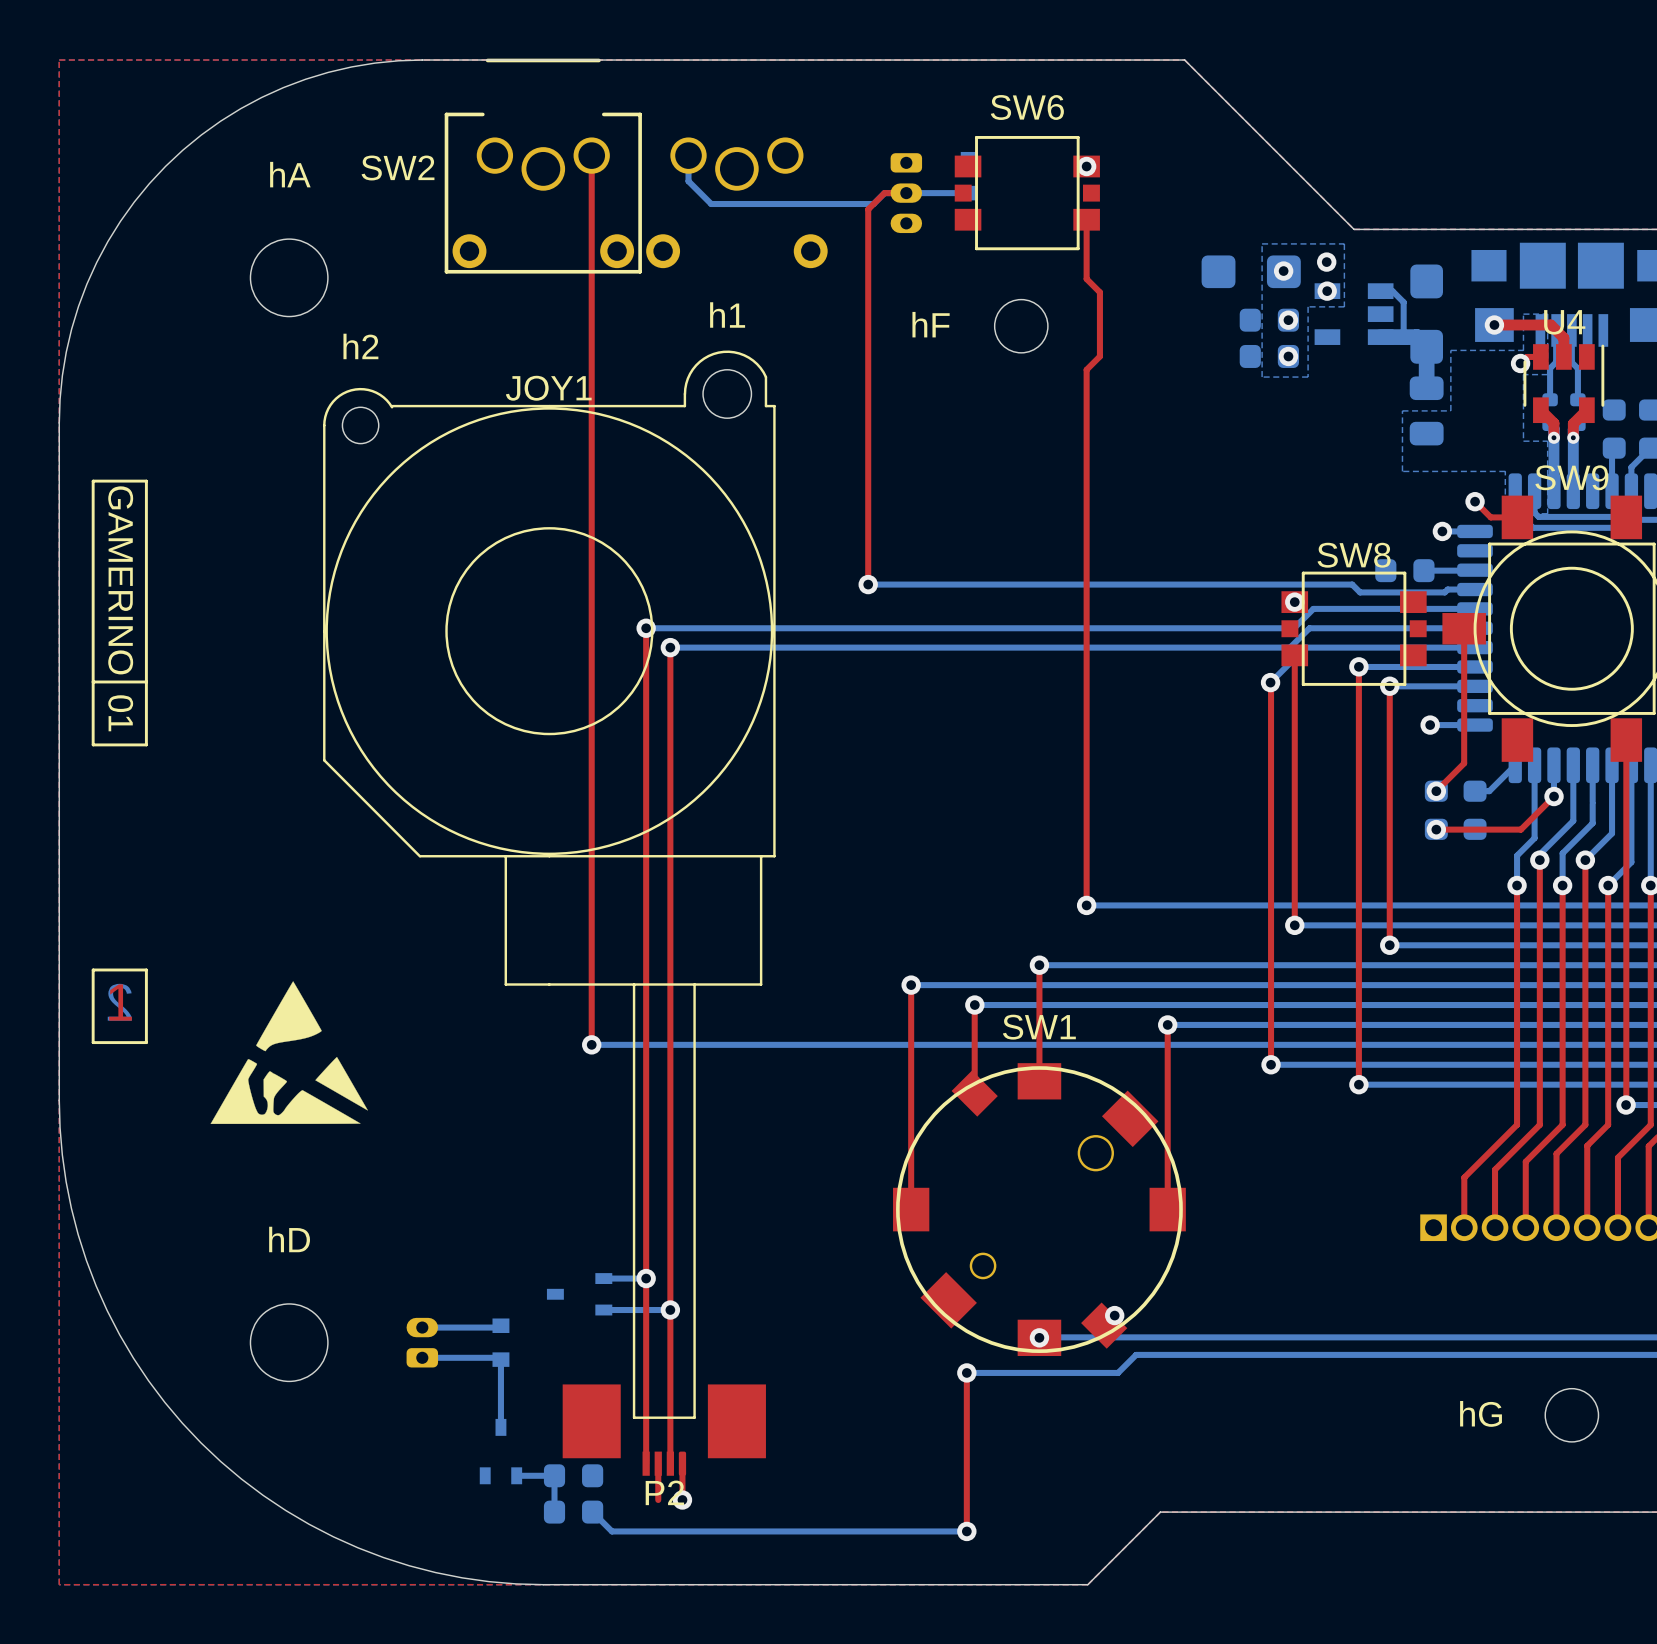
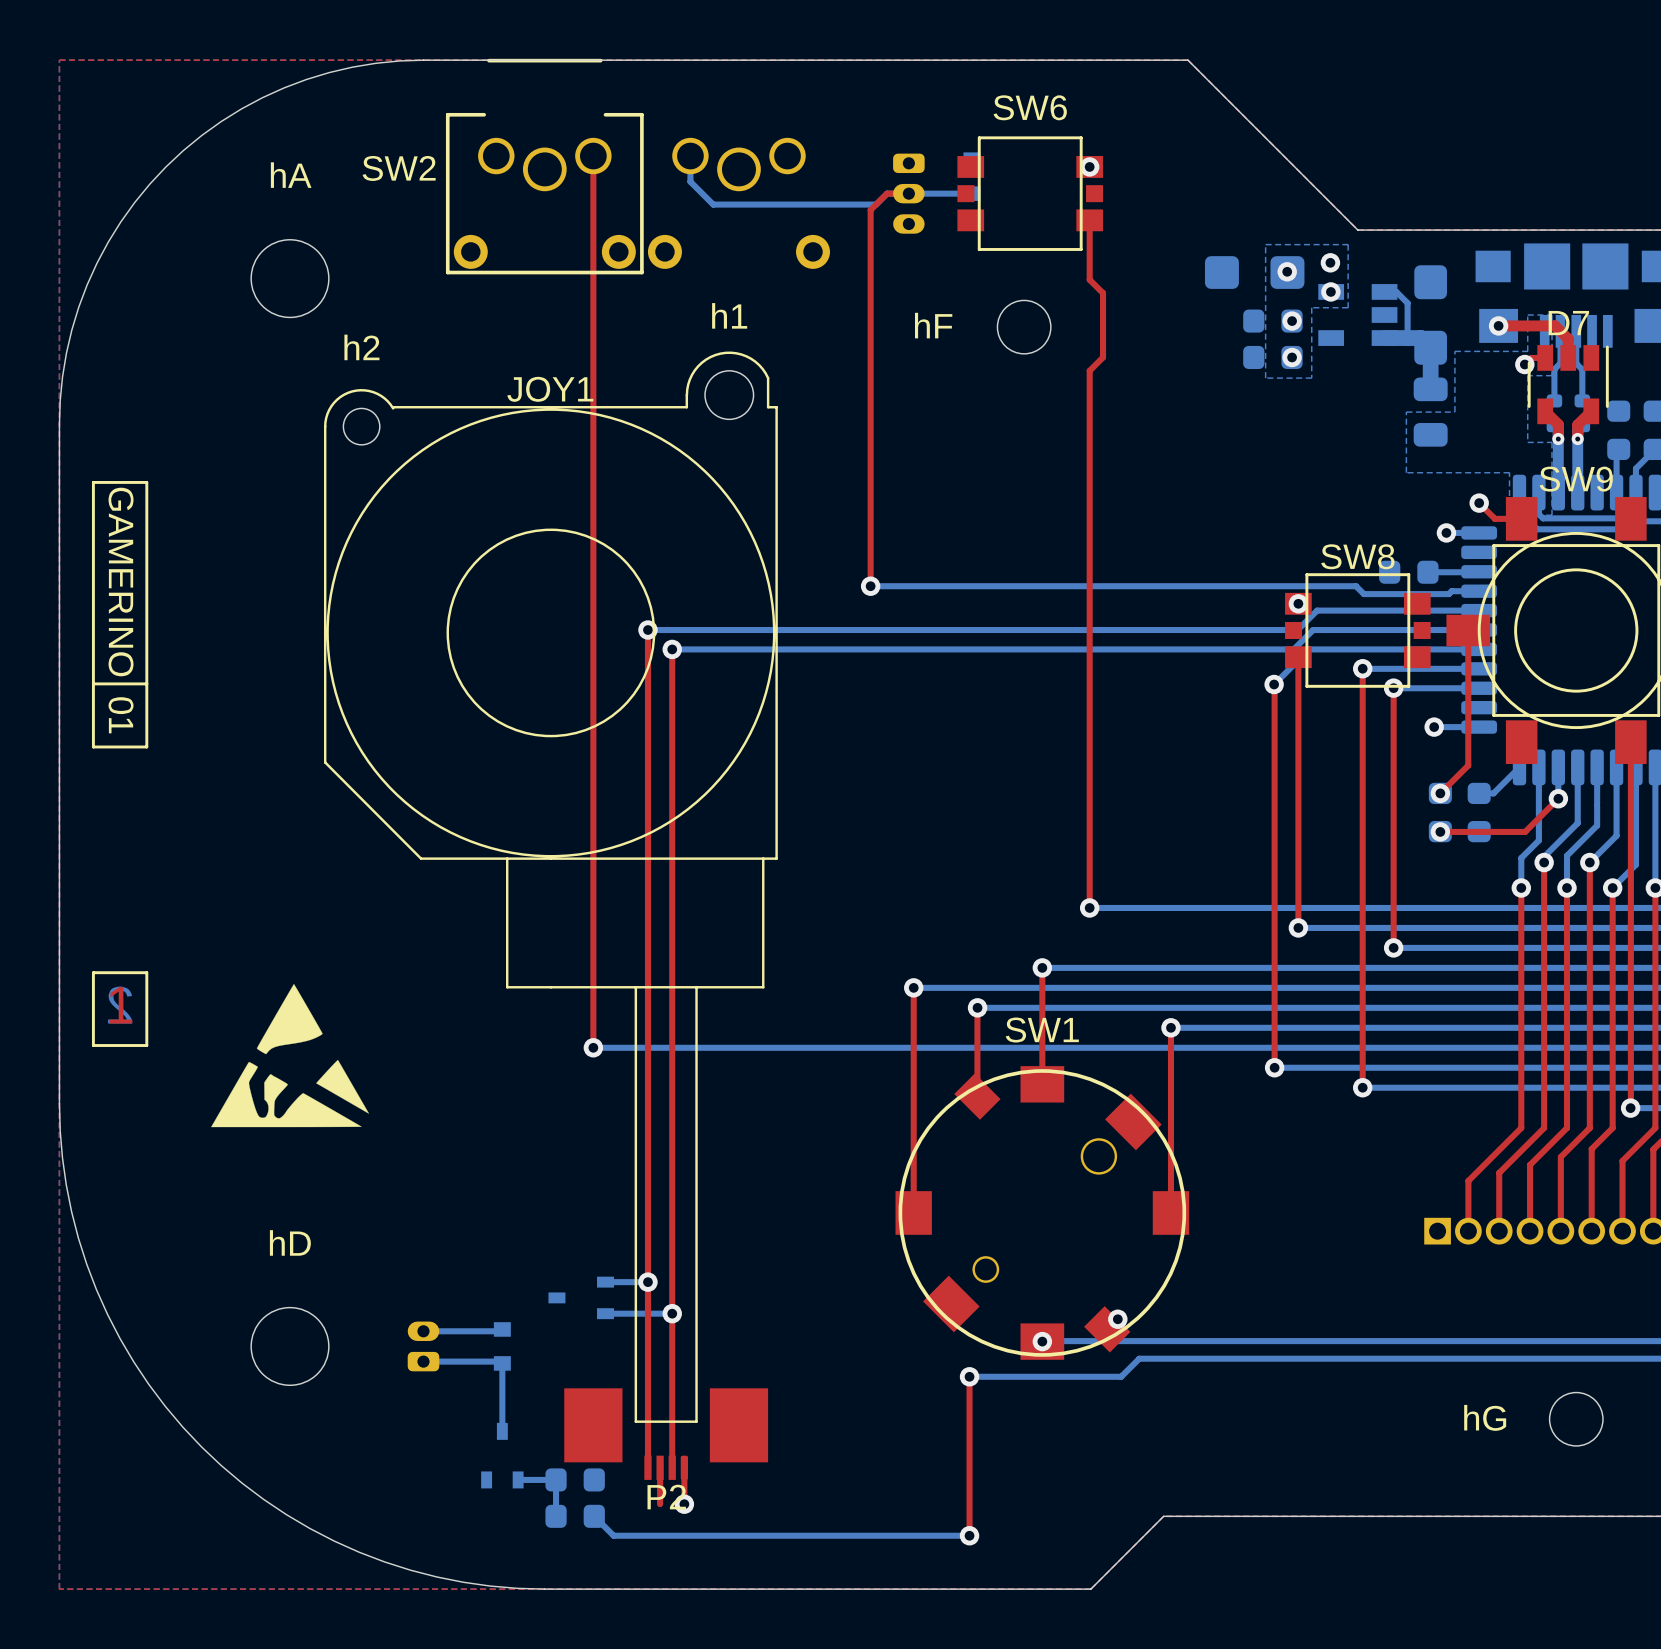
U4 name: U4 (1564, 322) -> D7 (1568, 323)

